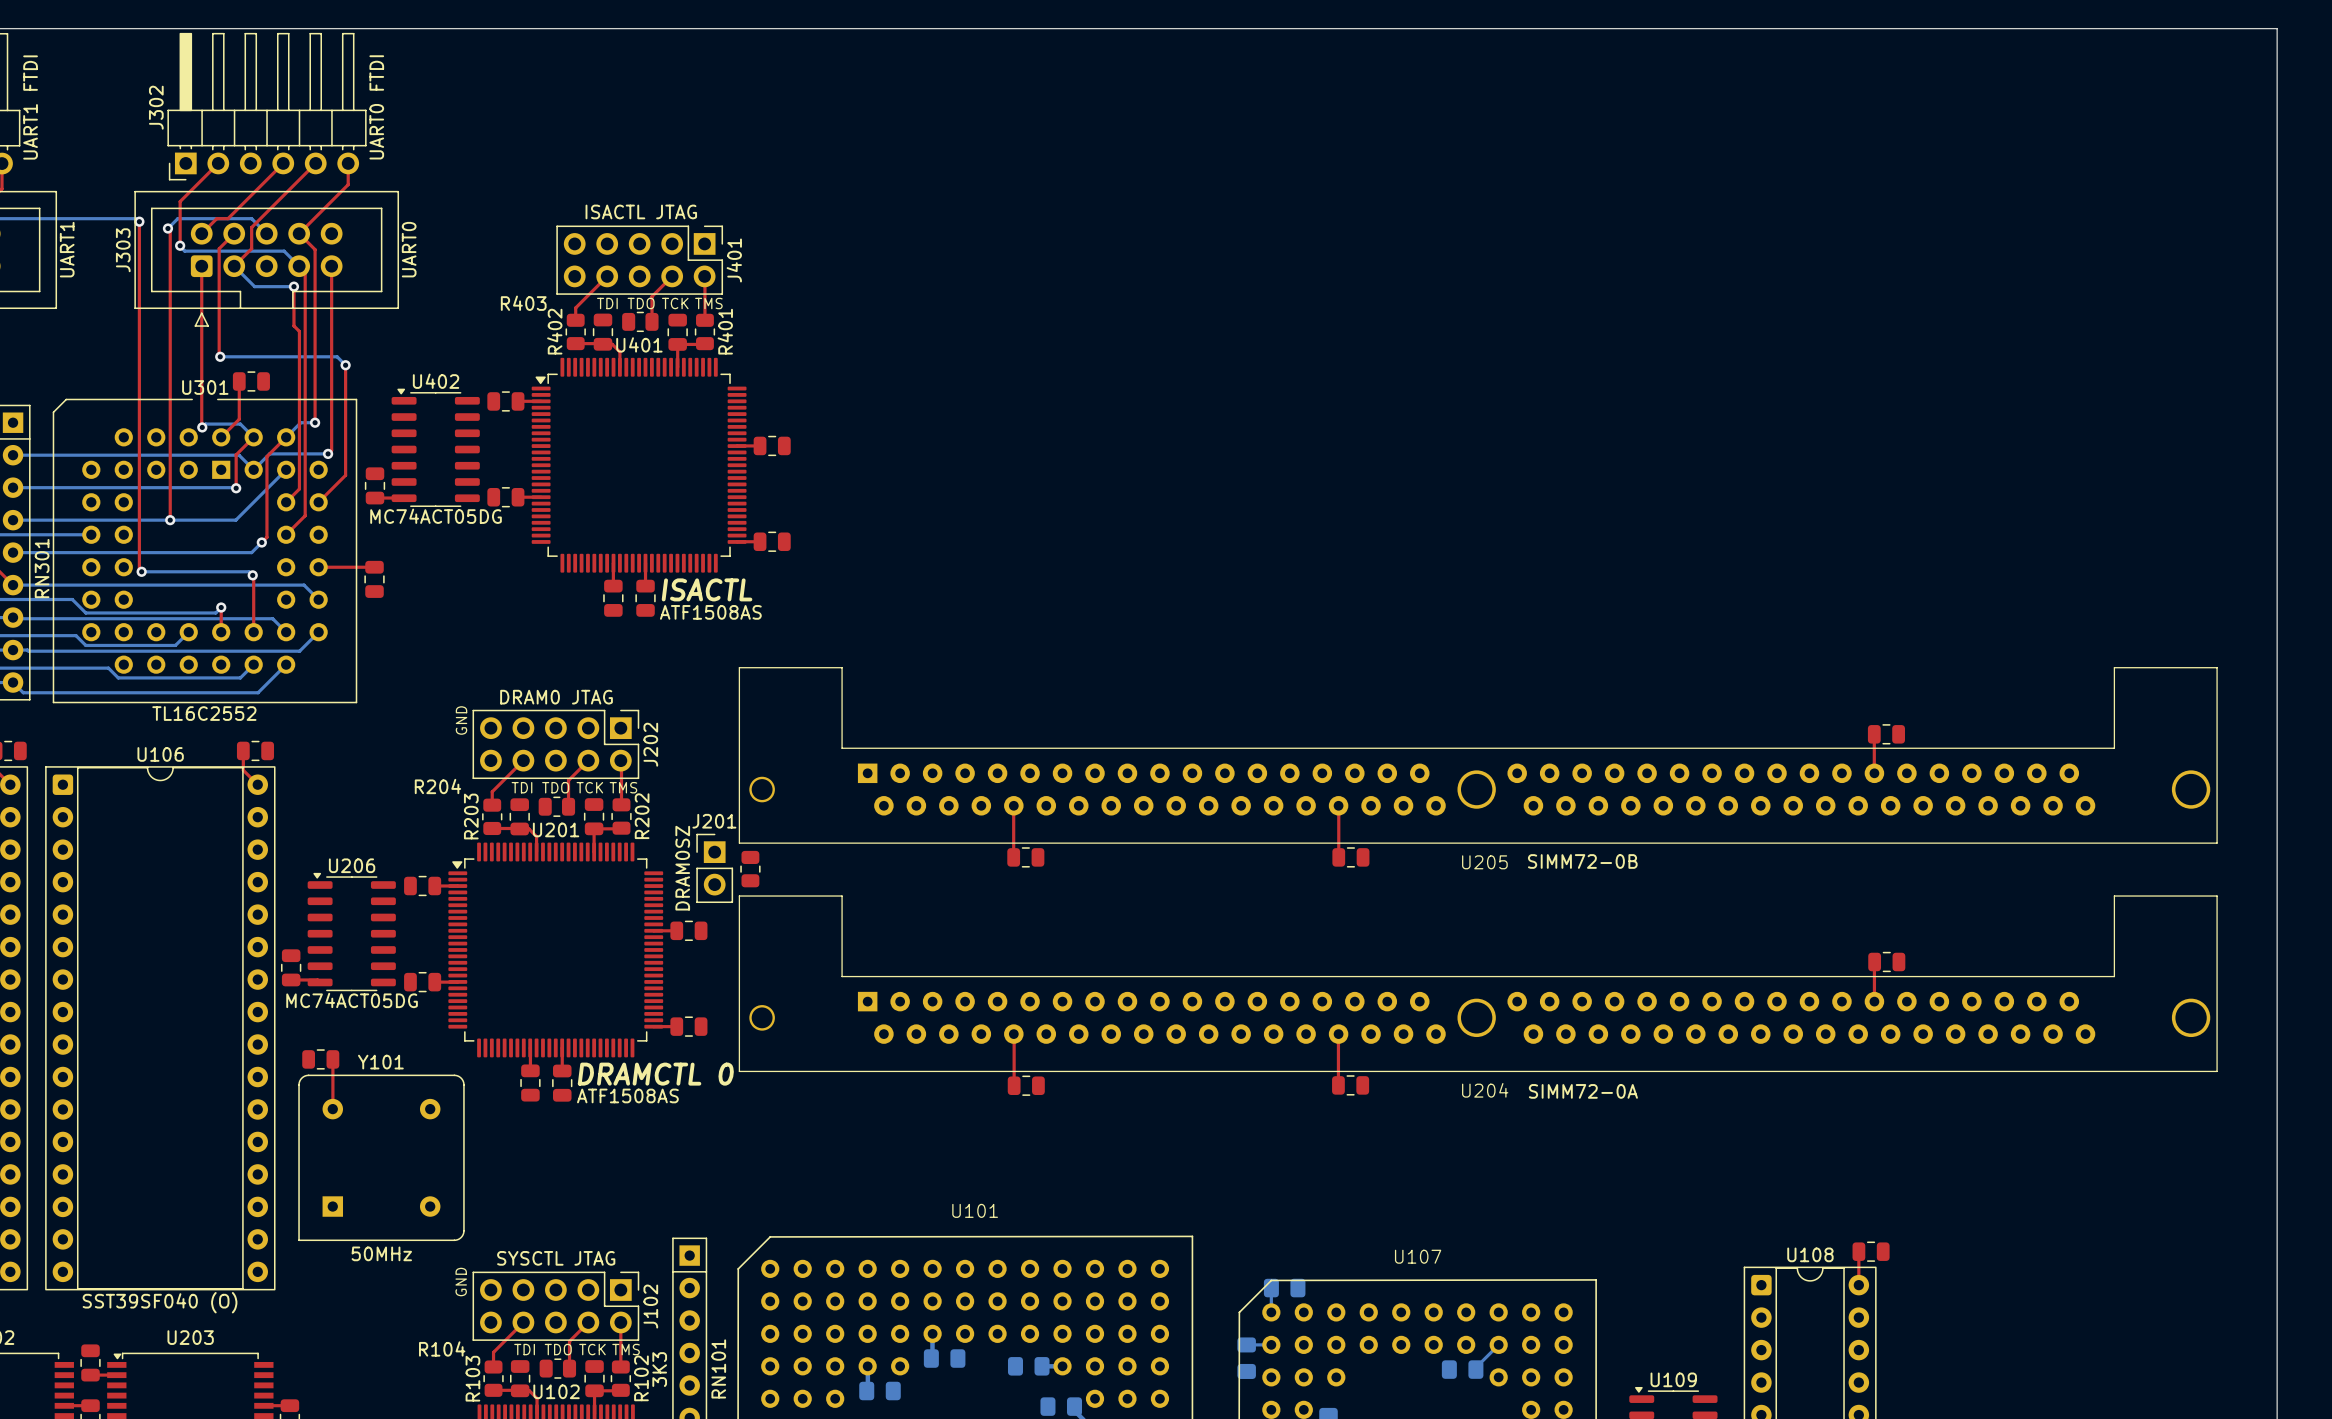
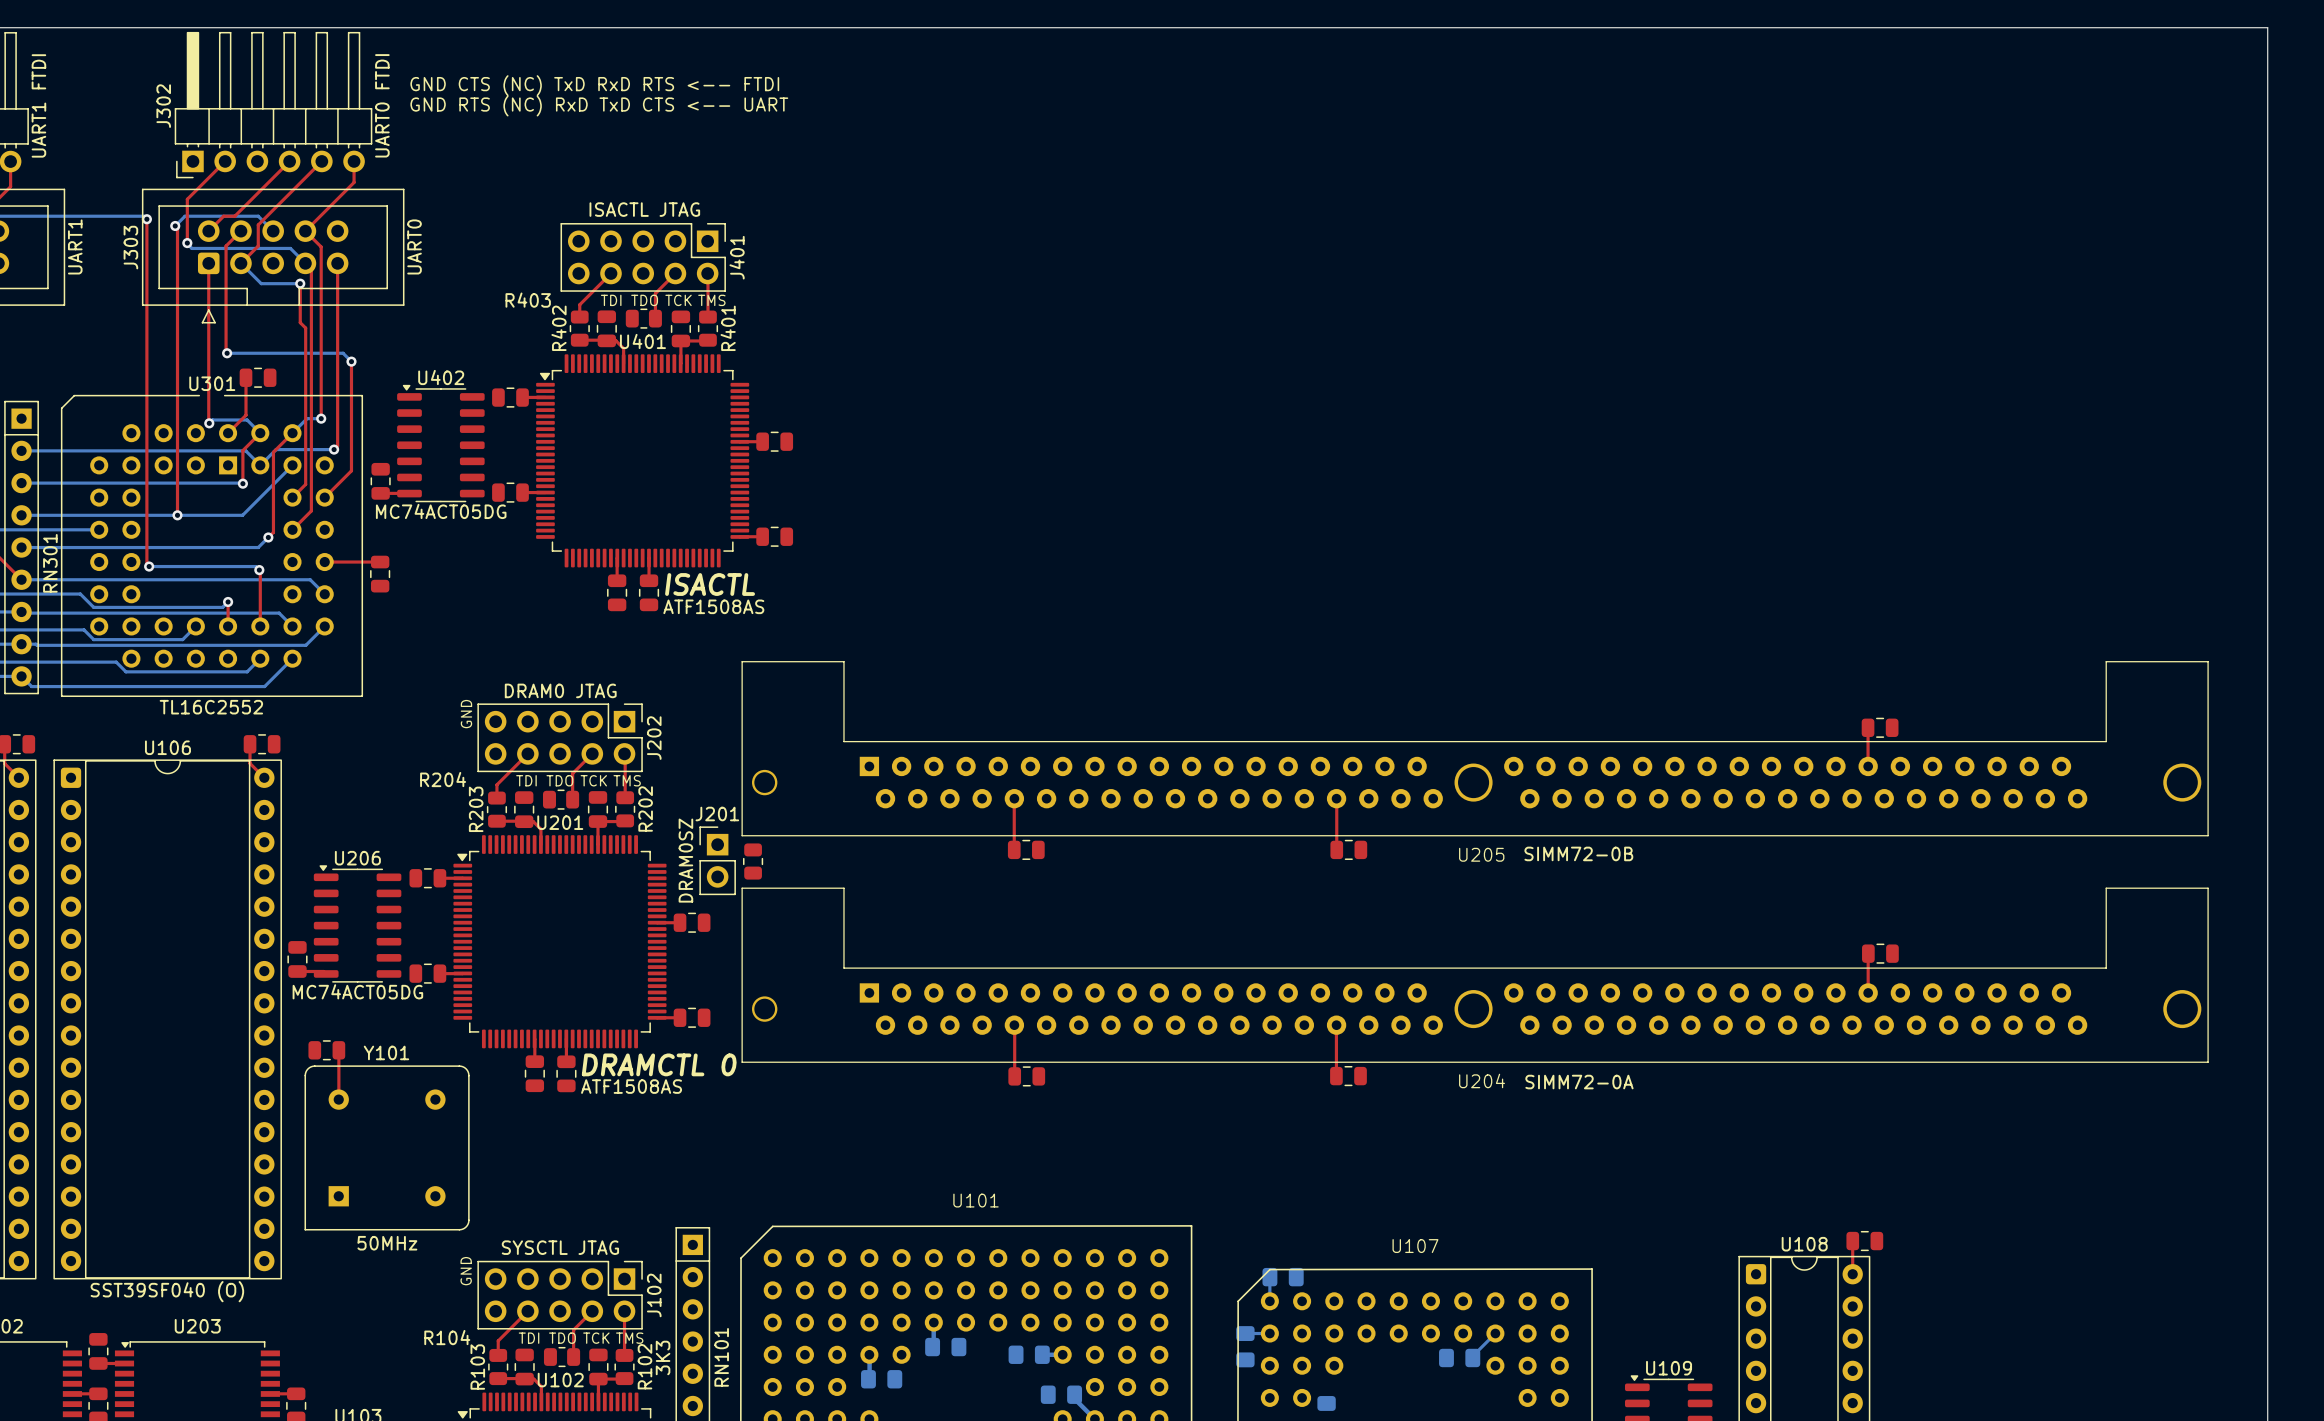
text: none -> GND CTS (NC) TxD RxD RTS <-- FTDI (594, 85)
text: none -> GND RTS (NC) RxD TxD CTS <-- UART (599, 106)

